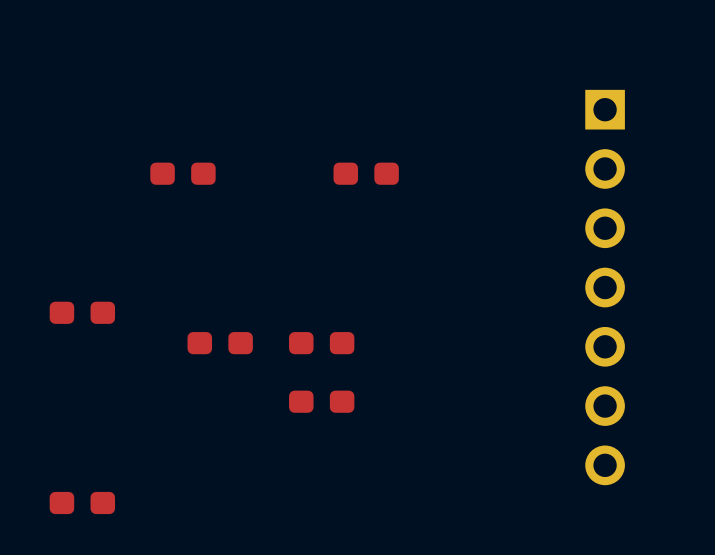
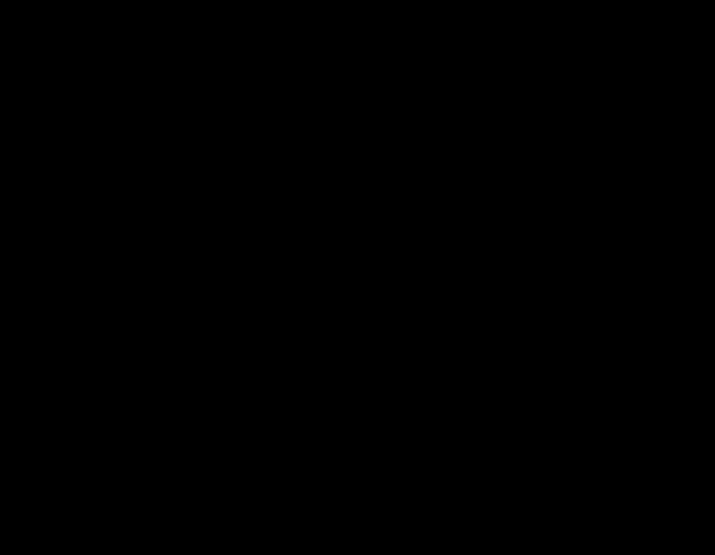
part: (182, 173) -> none
part: (366, 173) -> none
part: (605, 287) -> none
part: (82, 312) -> none
part: (220, 343) -> none
part: (321, 343) -> none
part: (321, 401) -> none
part: (82, 502) -> none

